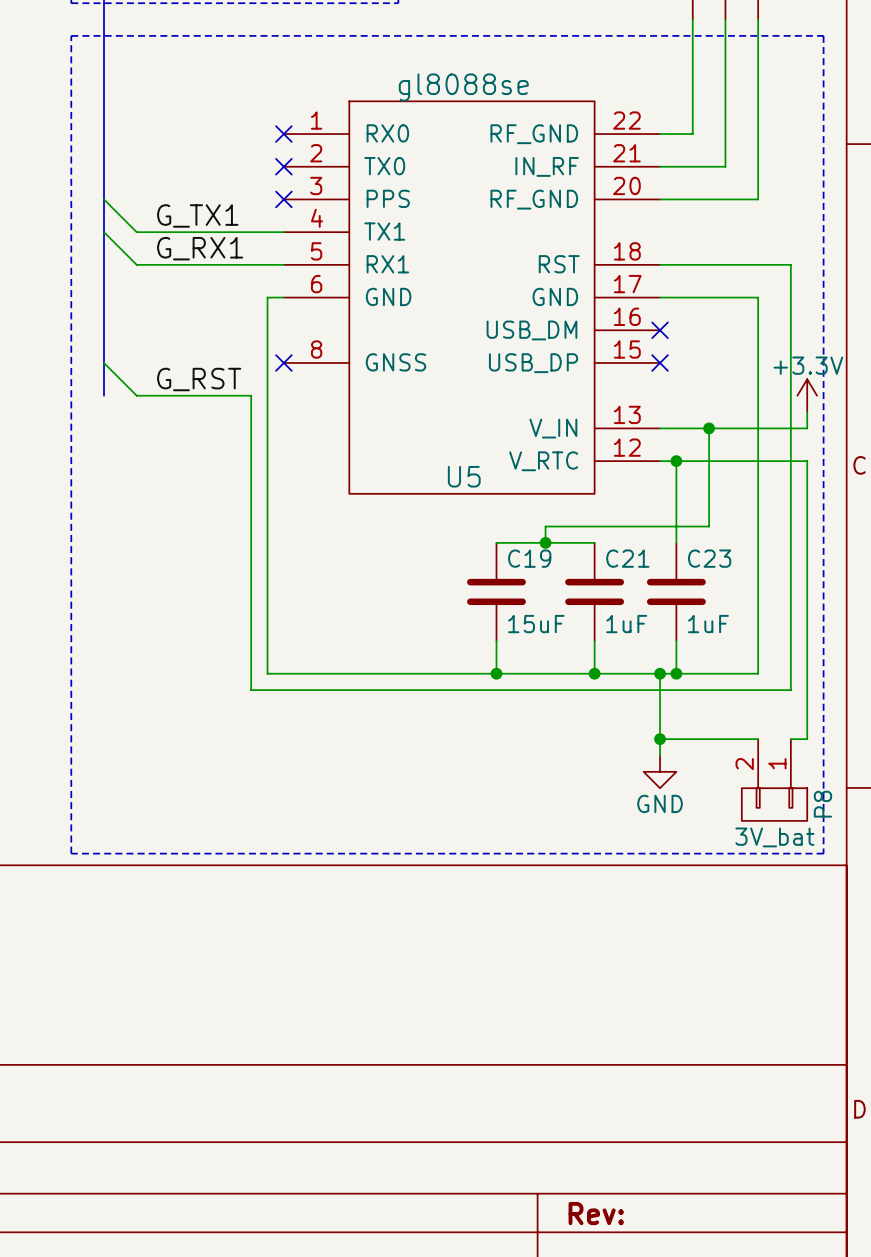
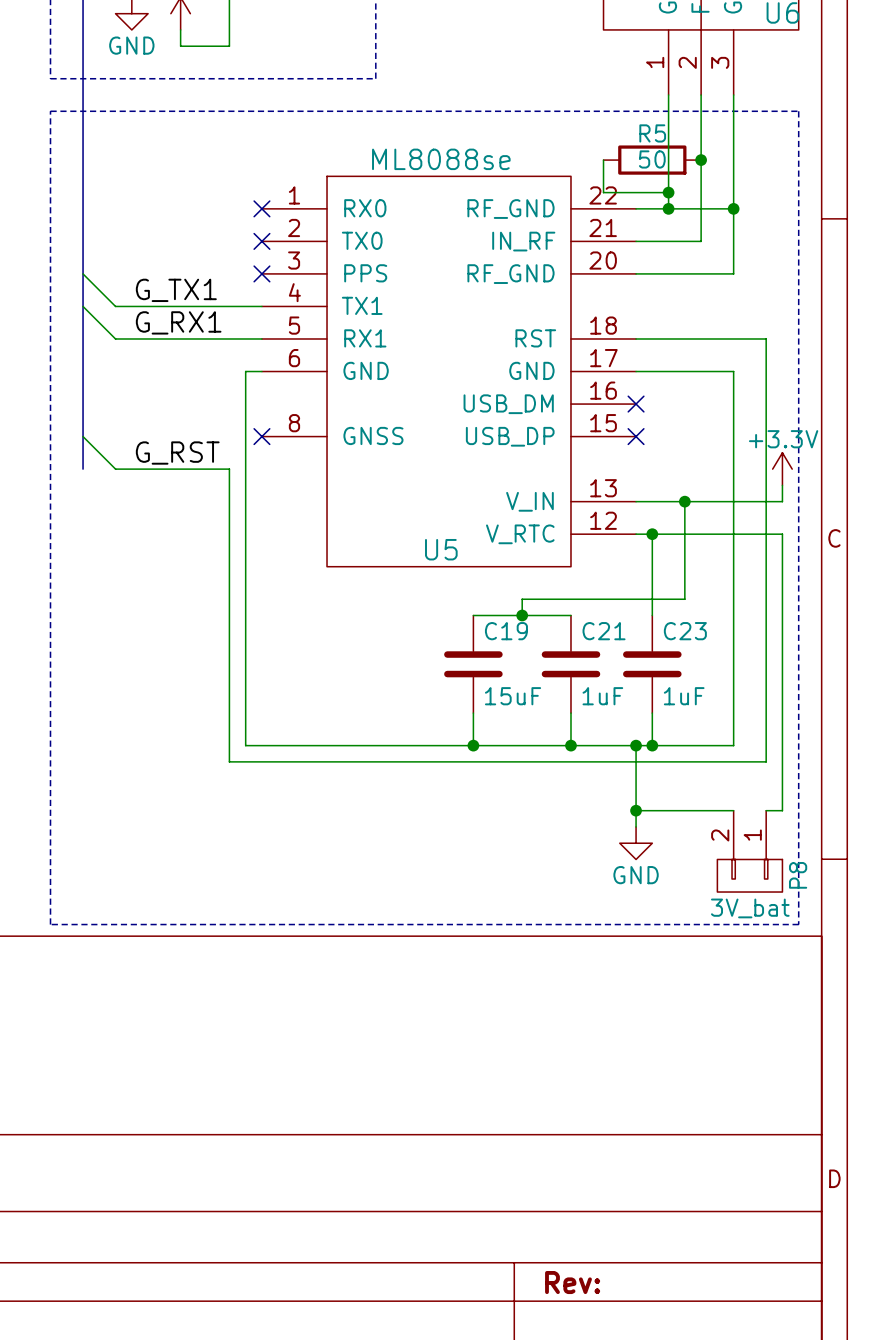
wire: none -> (603, 160) (603, 192) (668, 192)
R5: none -> 50 (652, 160)
junction: none -> (701, 160)
U5 value: gl8088se (463, 87) -> ML8088se (441, 159)
junction: none -> (668, 192)
wire: none -> (668, 208) (733, 208)
junction: none -> (668, 208)
junction: none -> (733, 208)

